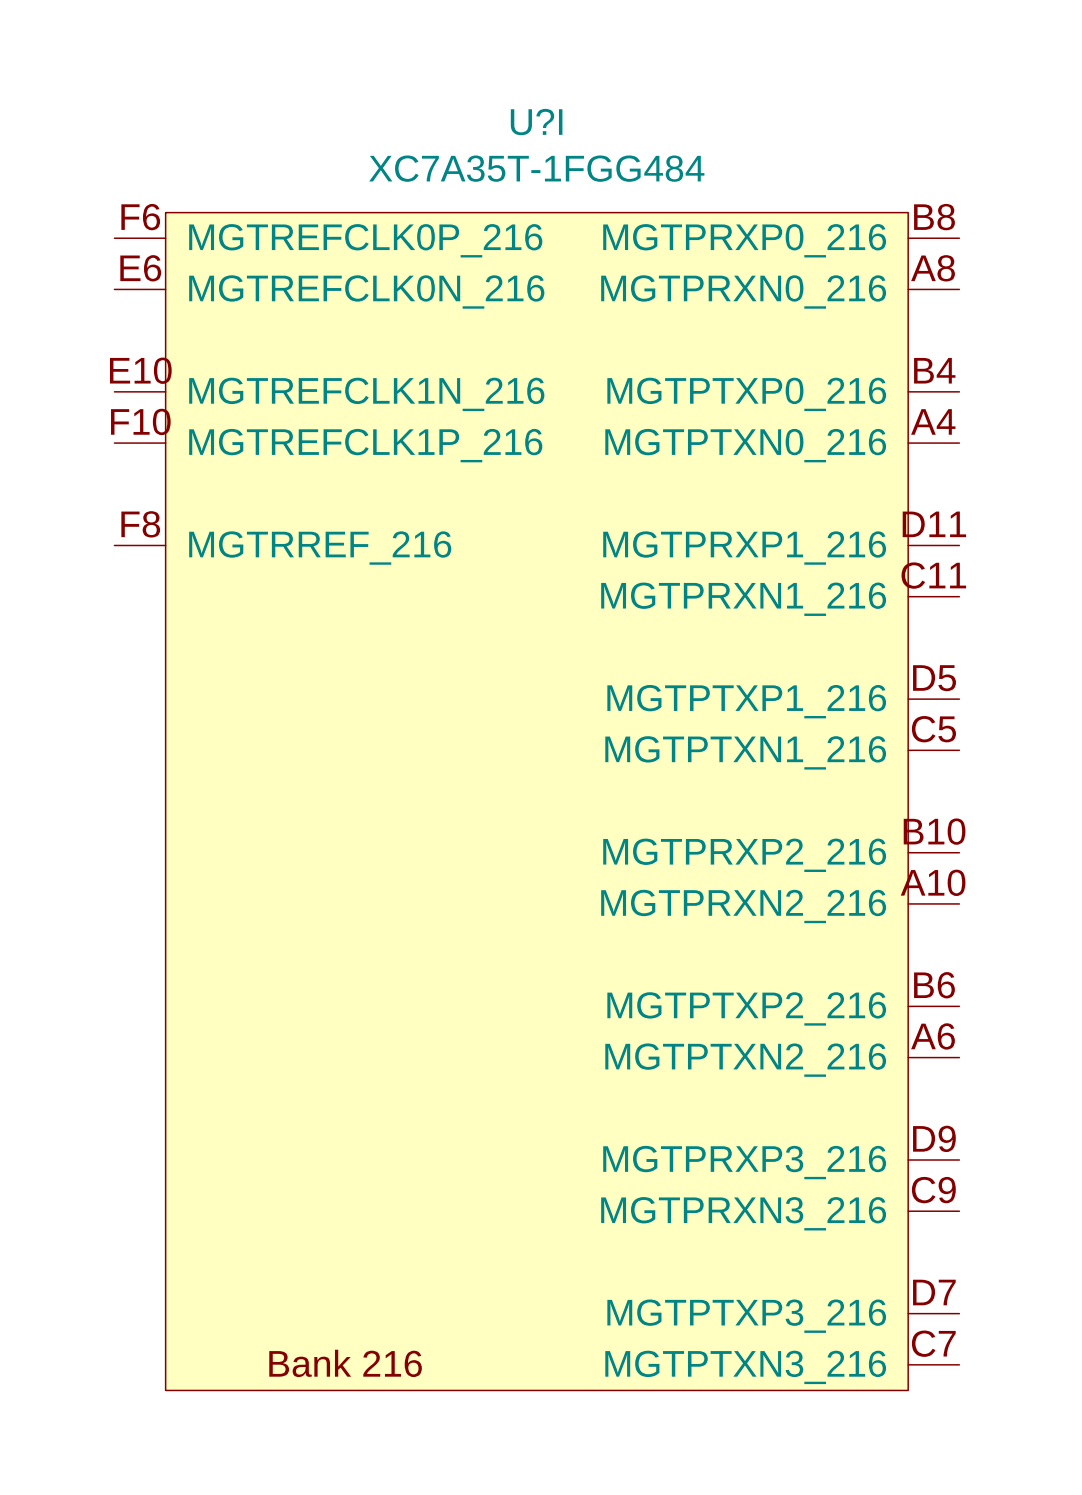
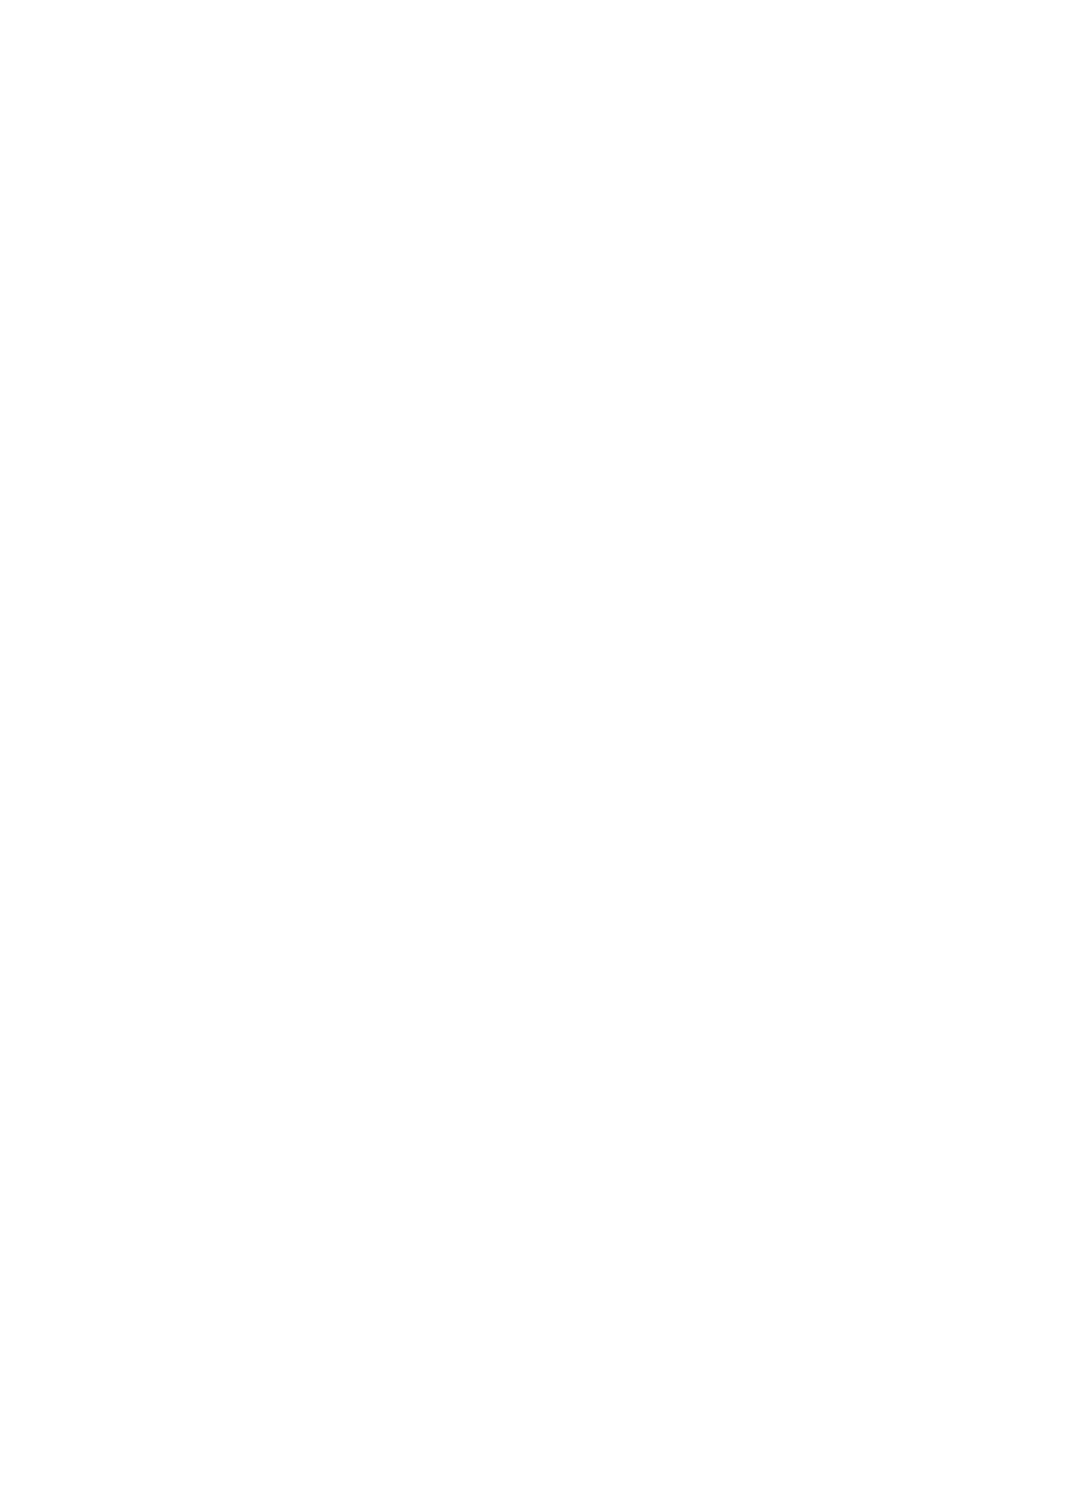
U?I: XC7A35T-1FGG484 (536, 801) -> none

